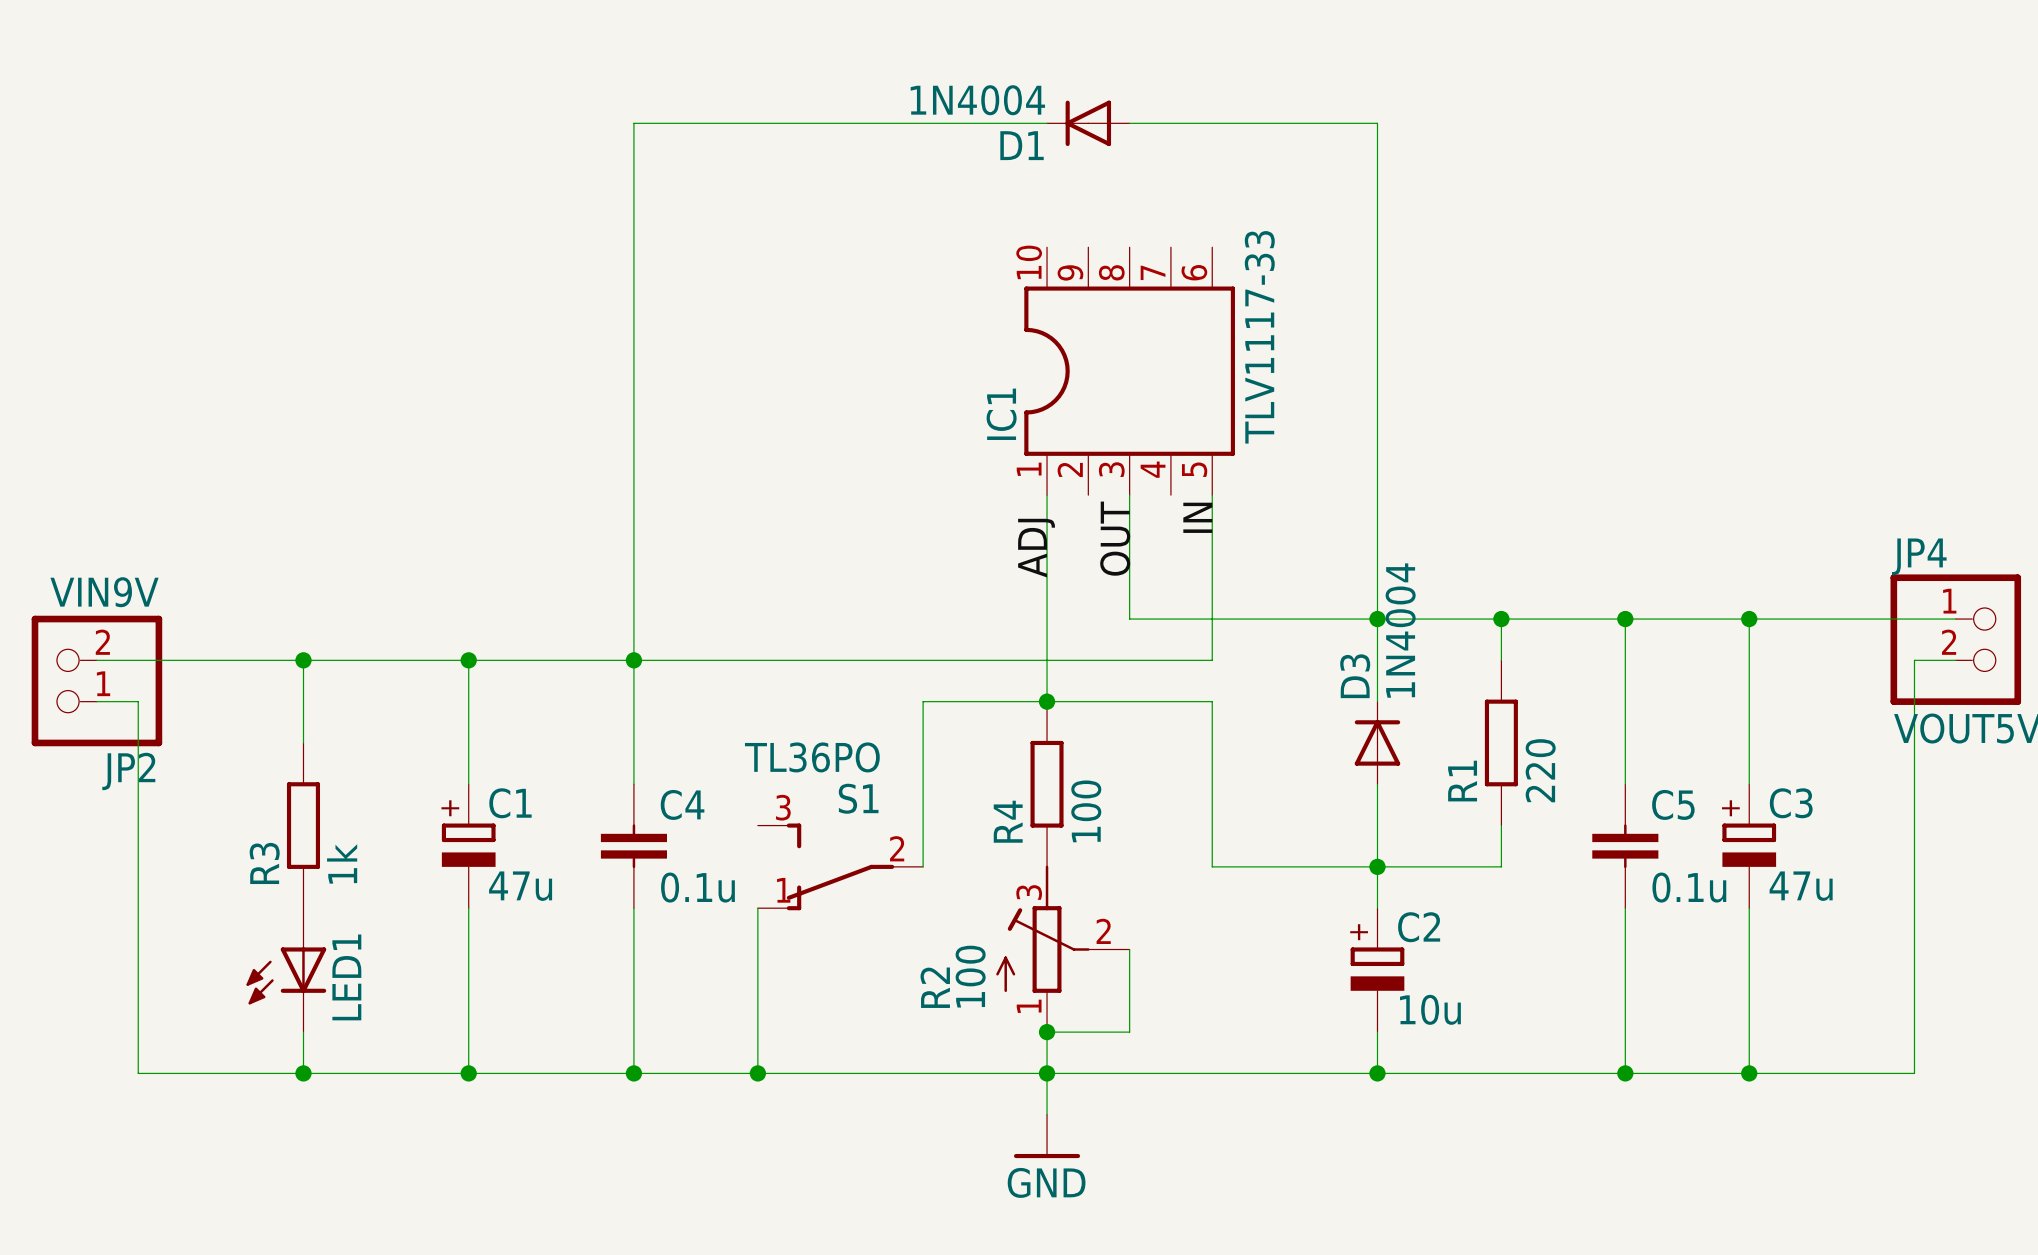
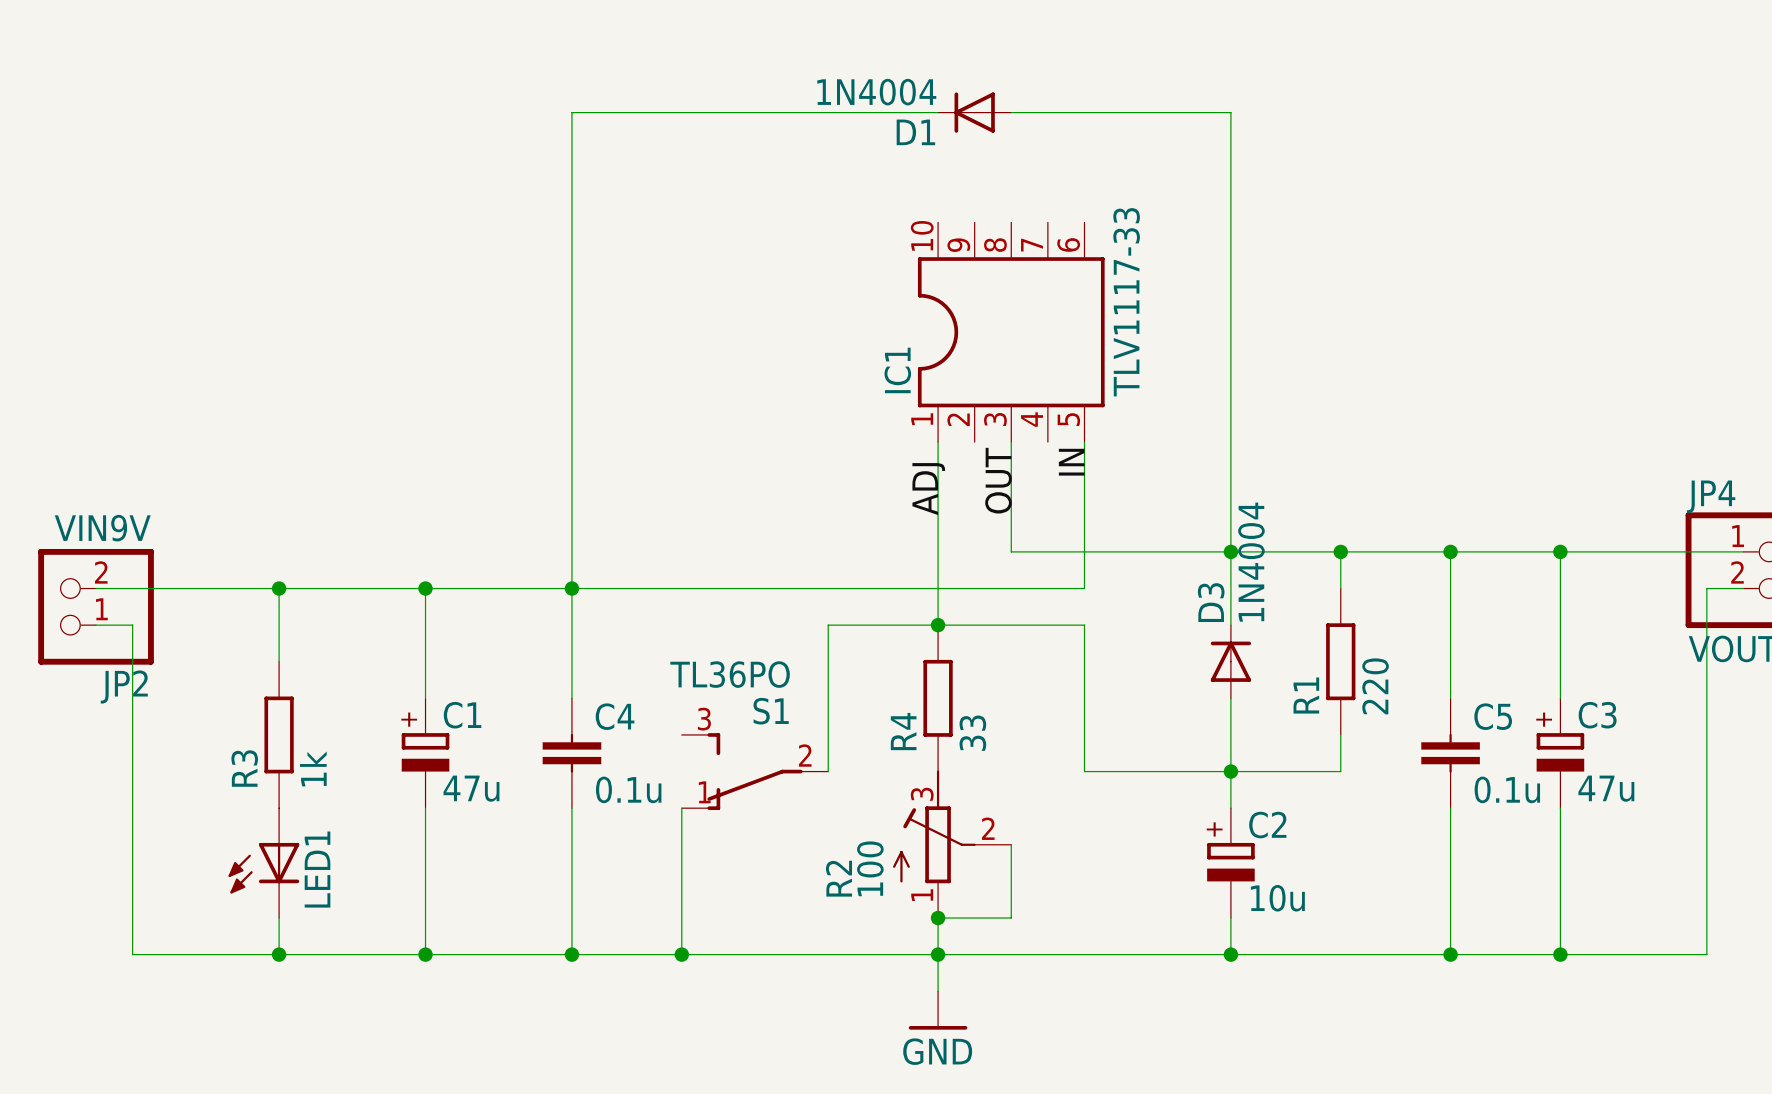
R4 value: 100 (1086, 811) -> 33 (972, 733)

